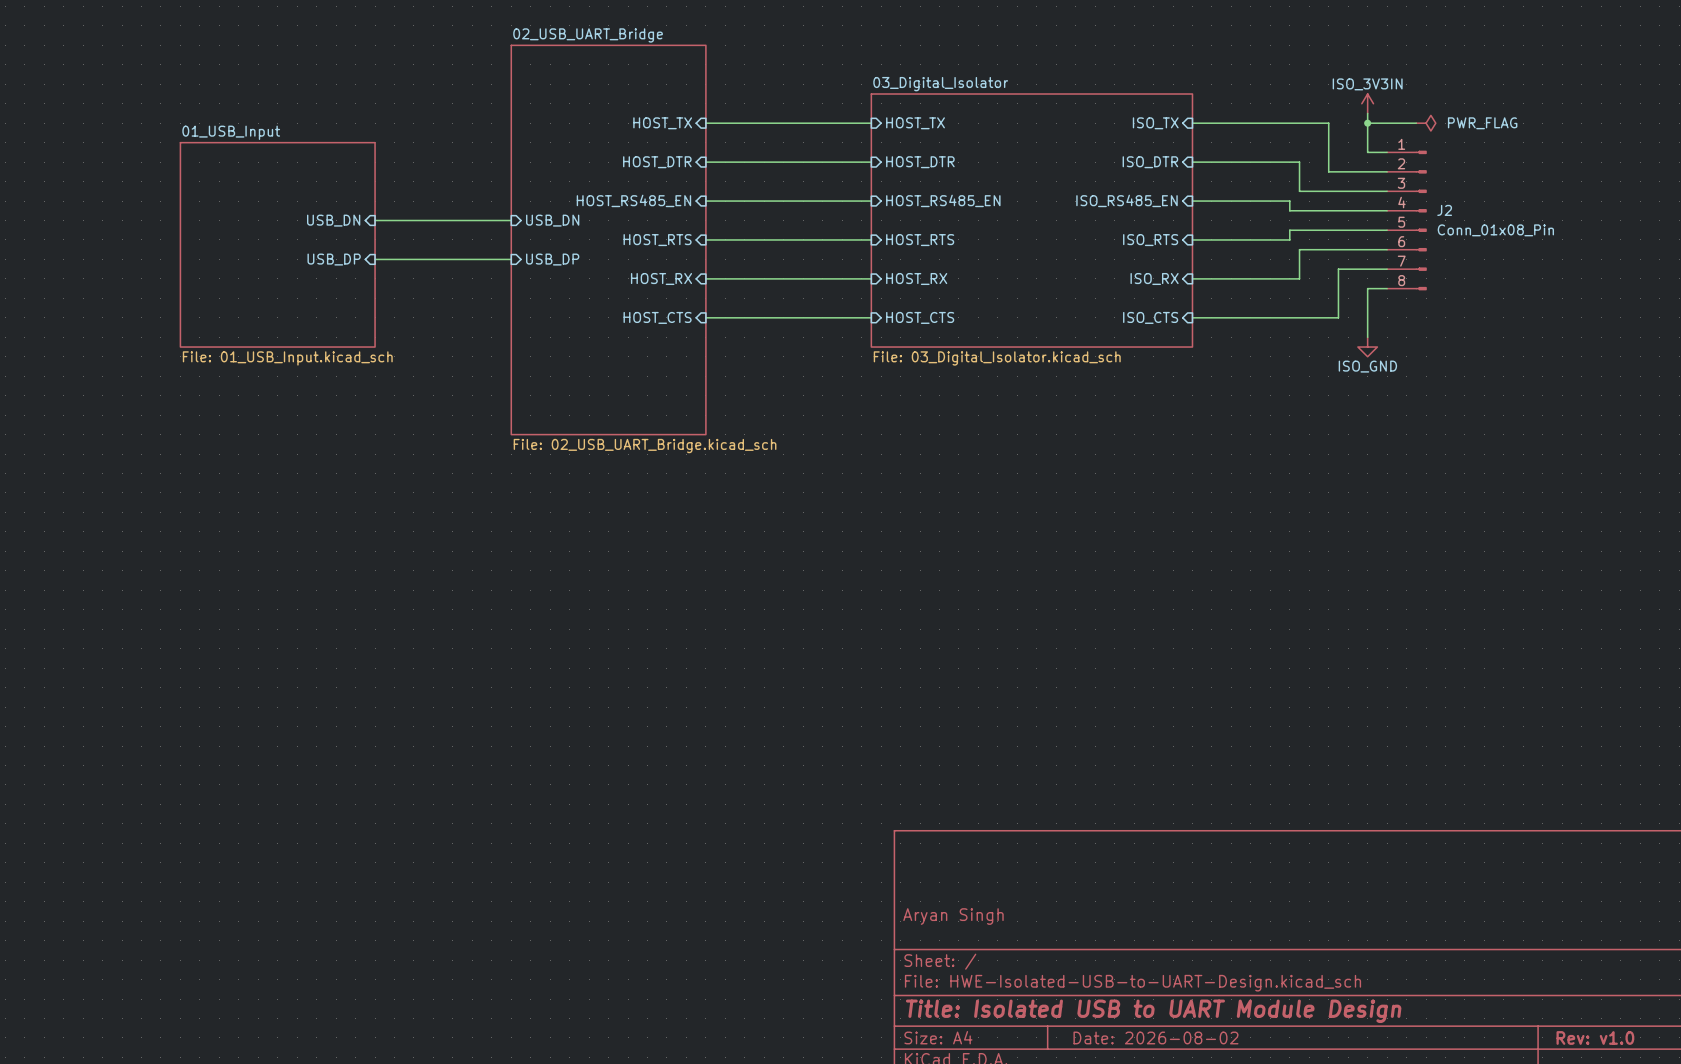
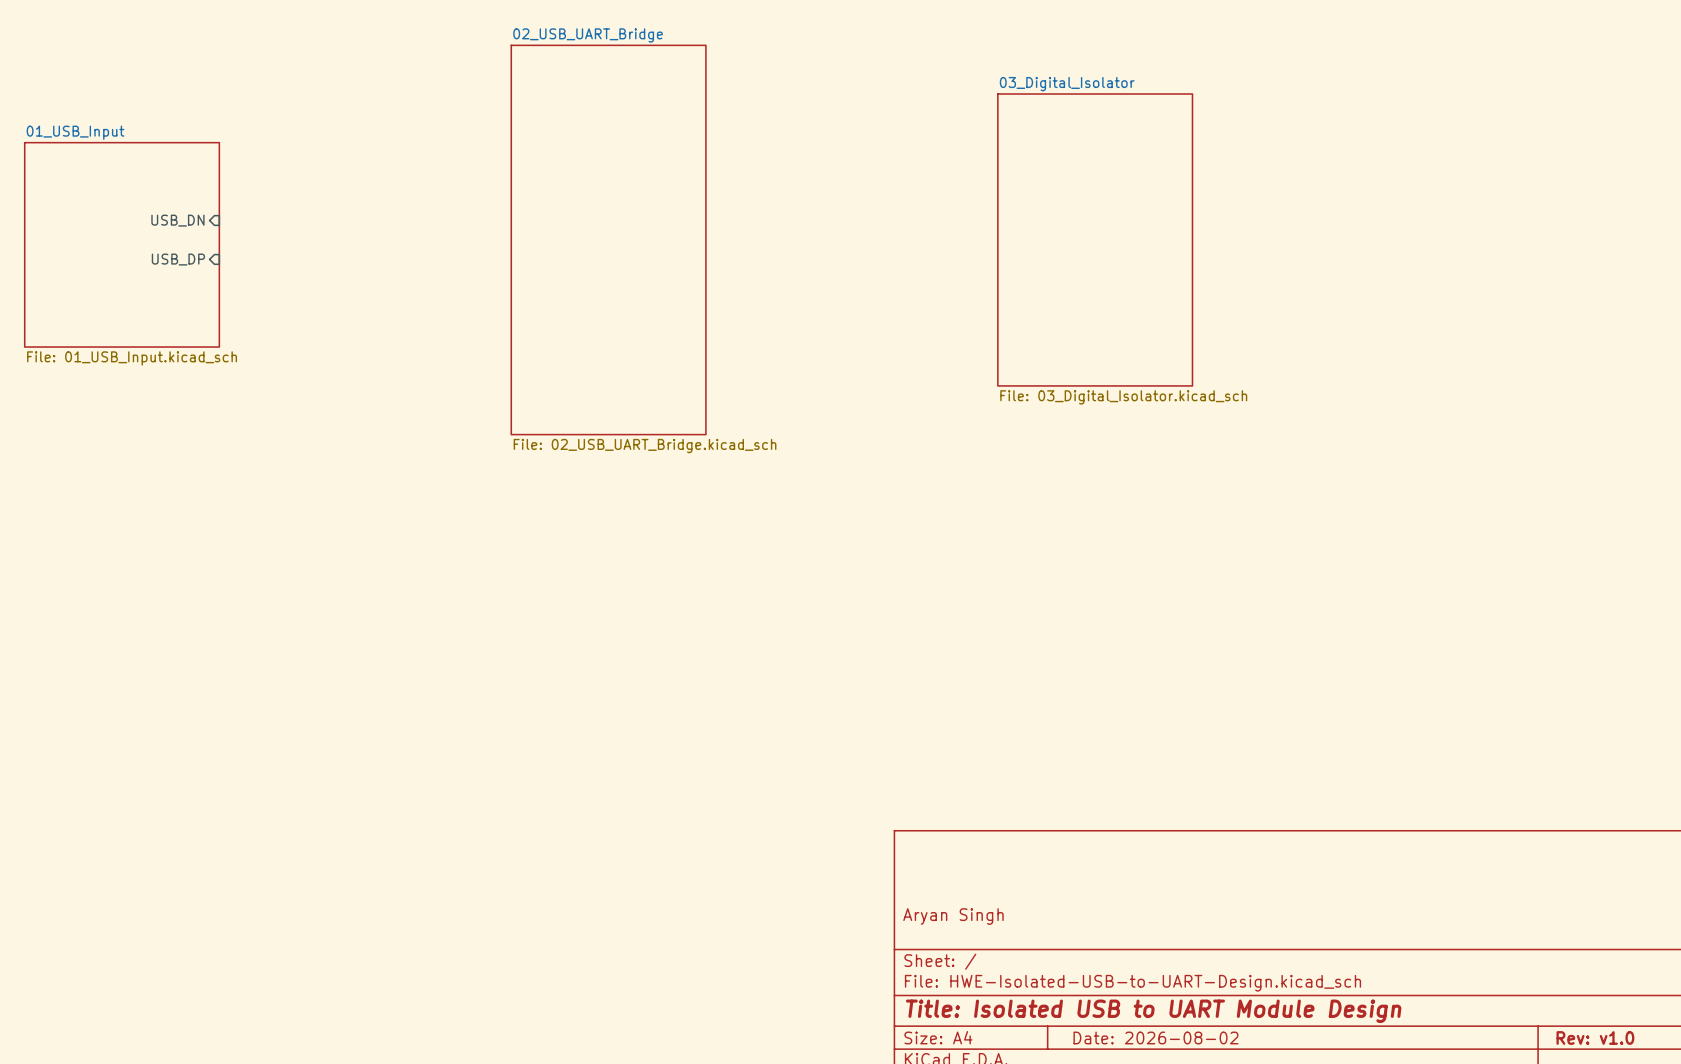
sheet 03_Digital_Isolator name position: 03_Digital_Isolator (940, 84) -> 03_Digital_Isolator (1067, 84)
sheet 03_Digital_Isolator shape: [870, 93, 1194, 348] -> [997, 93, 1194, 387]
power symbol: ISO_3V3IN (1367, 103) -> none
wire: (1367, 113) (1367, 152) (1387, 152) -> none
sheet pin: HOST_TX (662, 123) -> none
wire: (705, 123) (871, 123) -> none
sheet pin: HOST_TX (915, 123) -> none
sheet pin: ISO_TX (1155, 123) -> none
wire: (1192, 123) (1328, 123) (1328, 171) (1387, 171) -> none
wire: (1367, 123) (1416, 123) -> none
junction: (1367, 123) -> none
power symbol: PWR_FLAG (1426, 123) -> none
sheet pin: HOST_DTR (657, 162) -> none
wire: (705, 162) (871, 162) -> none
sheet pin: HOST_DTR (920, 162) -> none
sheet pin: ISO_DTR (1150, 162) -> none
wire: (1192, 162) (1299, 162) (1299, 191) (1387, 191) -> none
sheet pin: HOST_RS485_EN (633, 200) -> none
sheet pin: HOST_RS485_EN (943, 200) -> none
sheet pin: ISO_RS485_EN (1126, 200) -> none
wire: (705, 201) (871, 201) -> none
wire: (1192, 201) (1289, 201) (1289, 210) (1387, 210) -> none
sheet pin position: USB_DN (333, 220) -> USB_DN (177, 220)
wire: (375, 220) (511, 220) -> none
sheet pin: USB_DN (552, 220) -> none
J2: Conn_01x08_Pin (1406, 220) -> none
wire: (1387, 230) (1289, 230) (1289, 239) (1192, 239) -> none
wire: (705, 239) (871, 239) -> none
sheet pin: HOST_RTS (657, 240) -> none
sheet pin: HOST_RTS (920, 240) -> none
sheet pin: ISO_RTS (1150, 240) -> none
sheet 01_USB_Input position: (277, 244) -> (122, 244)
wire: (1387, 249) (1299, 249) (1299, 278) (1192, 278) -> none
sheet pin position: USB_DP (334, 259) -> USB_DP (178, 259)
wire: (375, 259) (511, 259) -> none
sheet pin: USB_DP (552, 259) -> none
wire: (1387, 269) (1338, 269) (1338, 317) (1192, 317) -> none
wire: (705, 278) (871, 278) -> none
sheet pin: HOST_RX (661, 279) -> none
sheet pin: HOST_RX (916, 279) -> none
sheet pin: ISO_RX (1154, 279) -> none
wire: (1387, 288) (1367, 288) (1367, 337) -> none
sheet pin: HOST_CTS (657, 317) -> none
wire: (705, 317) (871, 317) -> none
sheet pin: HOST_CTS (920, 317) -> none
sheet pin: ISO_CTS (1150, 317) -> none
power symbol: ISO_GND (1367, 347) -> none
sheet 03_Digital_Isolator value position: File: 03_Digital_Isolator.kicad_sch (997, 358) -> File: 03_Digital_Isolator.kicad_sch (1123, 397)

